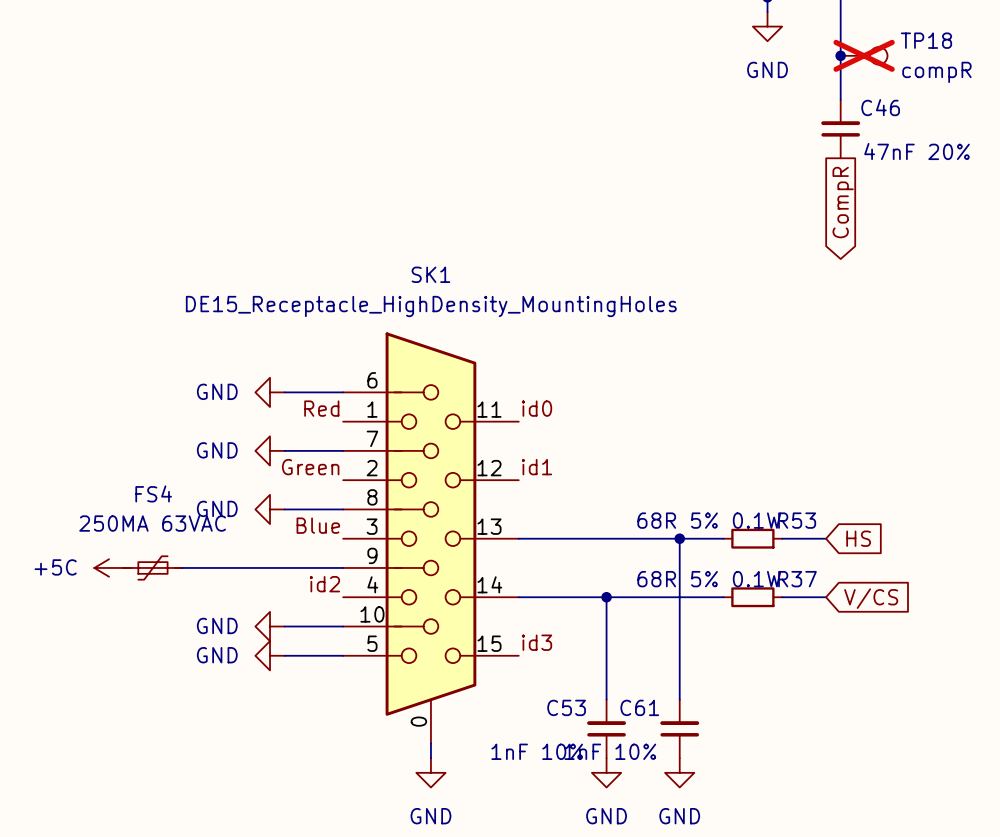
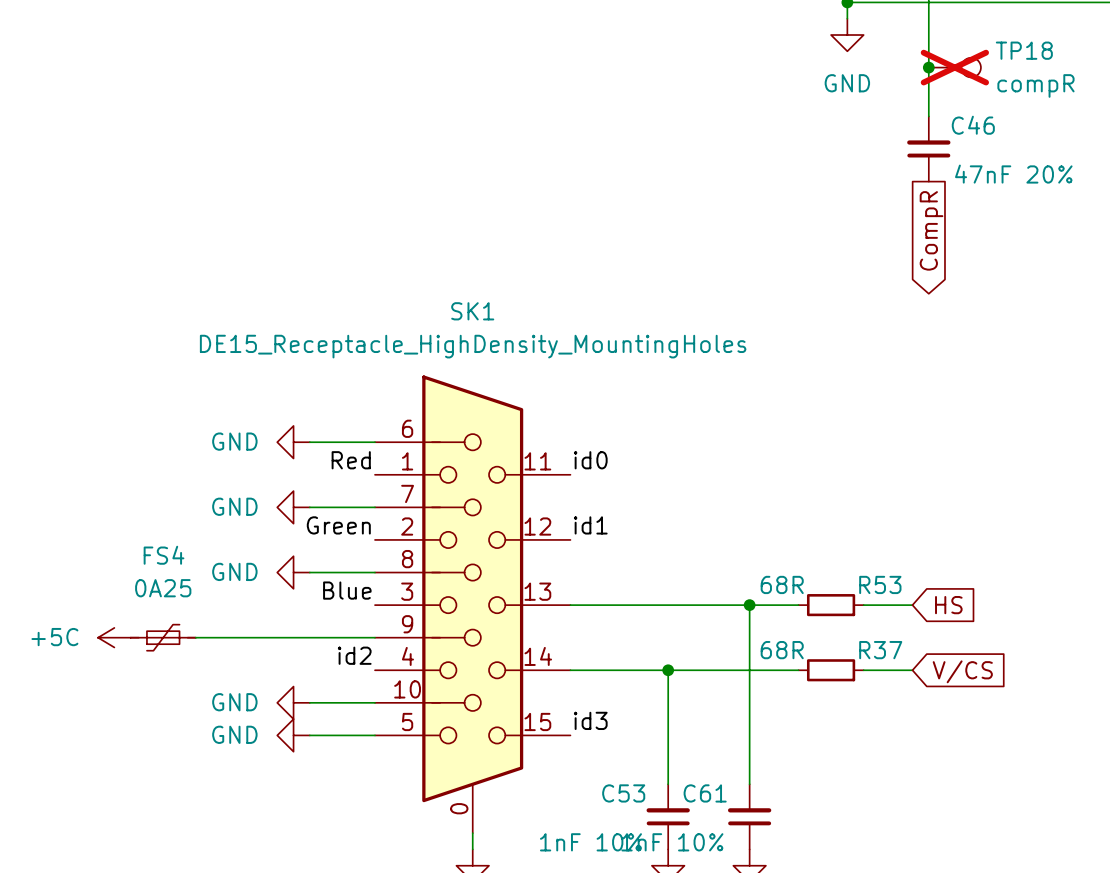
R53 value: 68R 5% 0.1W (709, 520) -> 68R (782, 584)
FS4 value: 250MA 63VAC (152, 523) -> 0A25 (163, 588)
R37 value: 68R 5% 0.1W (709, 579) -> 68R (782, 650)

